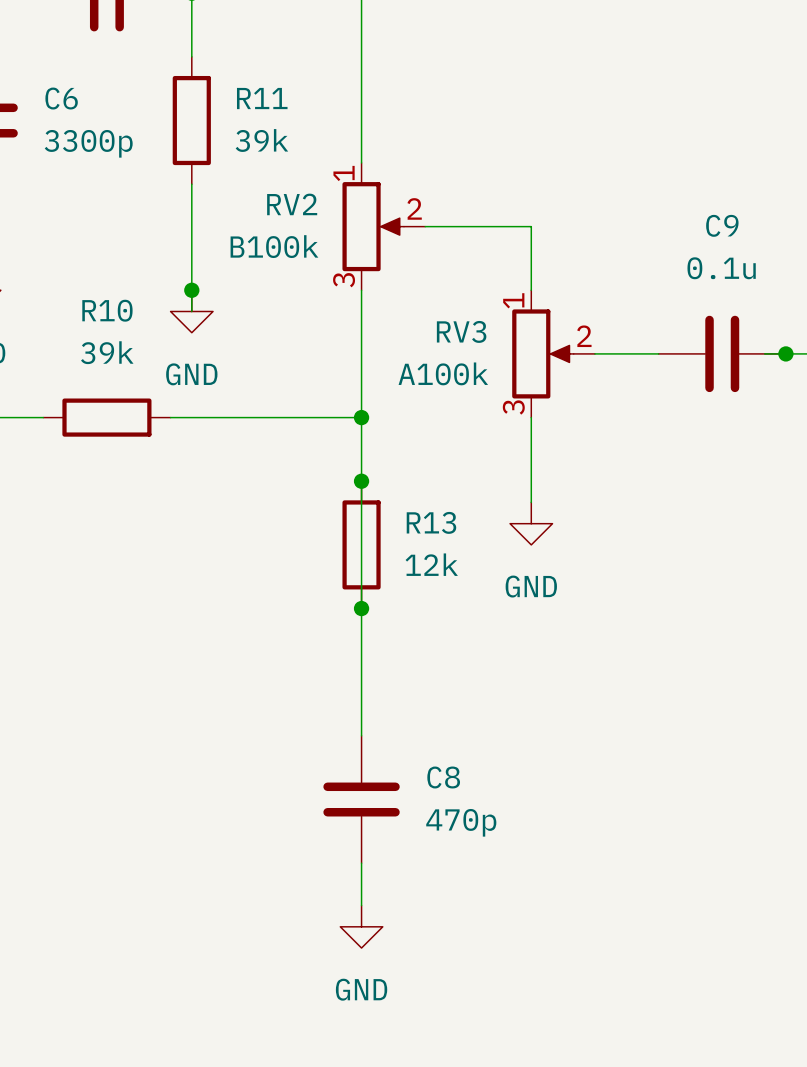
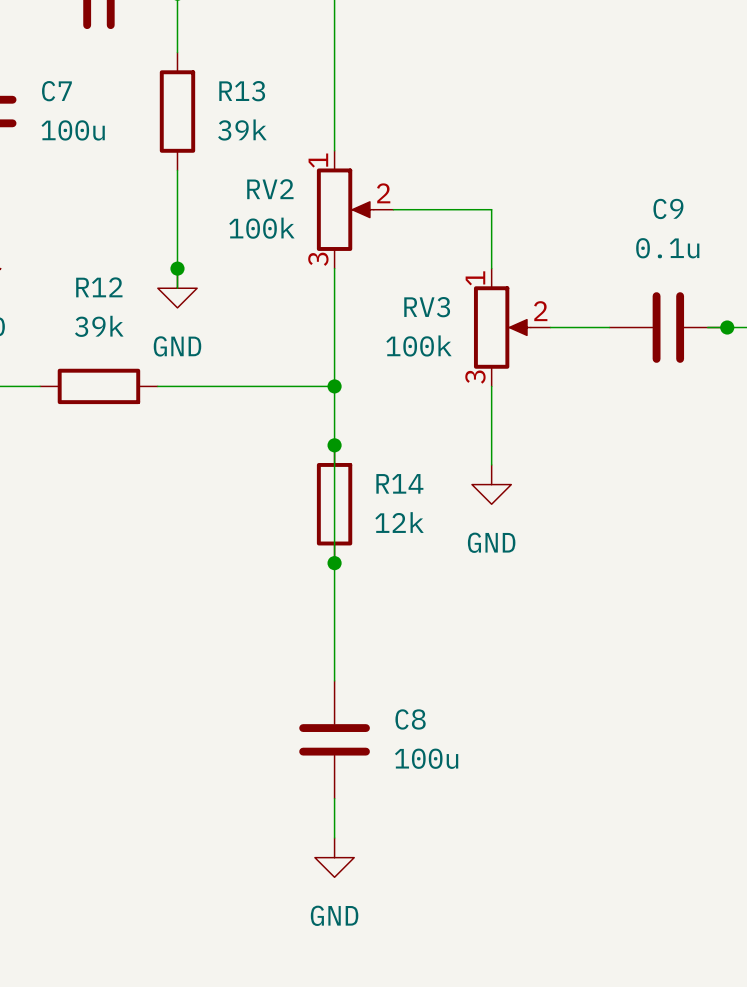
C6 name: C6 (61, 98) -> C7 (56, 91)
R11 name: R11 (262, 98) -> R13 (242, 91)
C6 value: 3300p (88, 143) -> 100u (73, 130)
RV2 value: B100k (274, 246) -> 100k (261, 228)
R10 name: R10 (107, 310) -> R12 (99, 287)
RV3 value: A100k (443, 373) -> 100k (418, 345)
R13 name: R13 (431, 522) -> R14 (399, 483)
C8 value: 470p (461, 822) -> 100u (426, 758)

